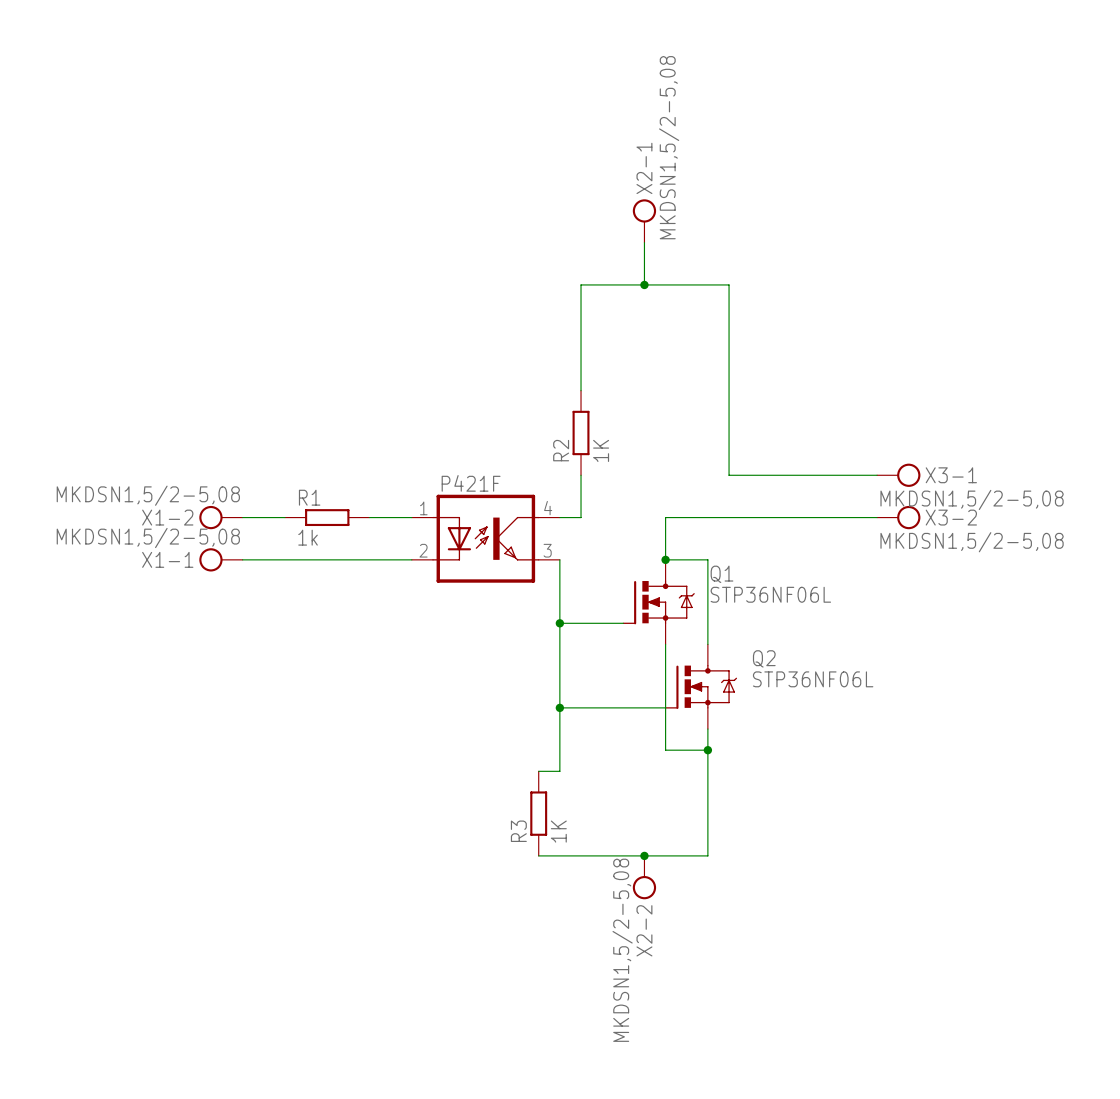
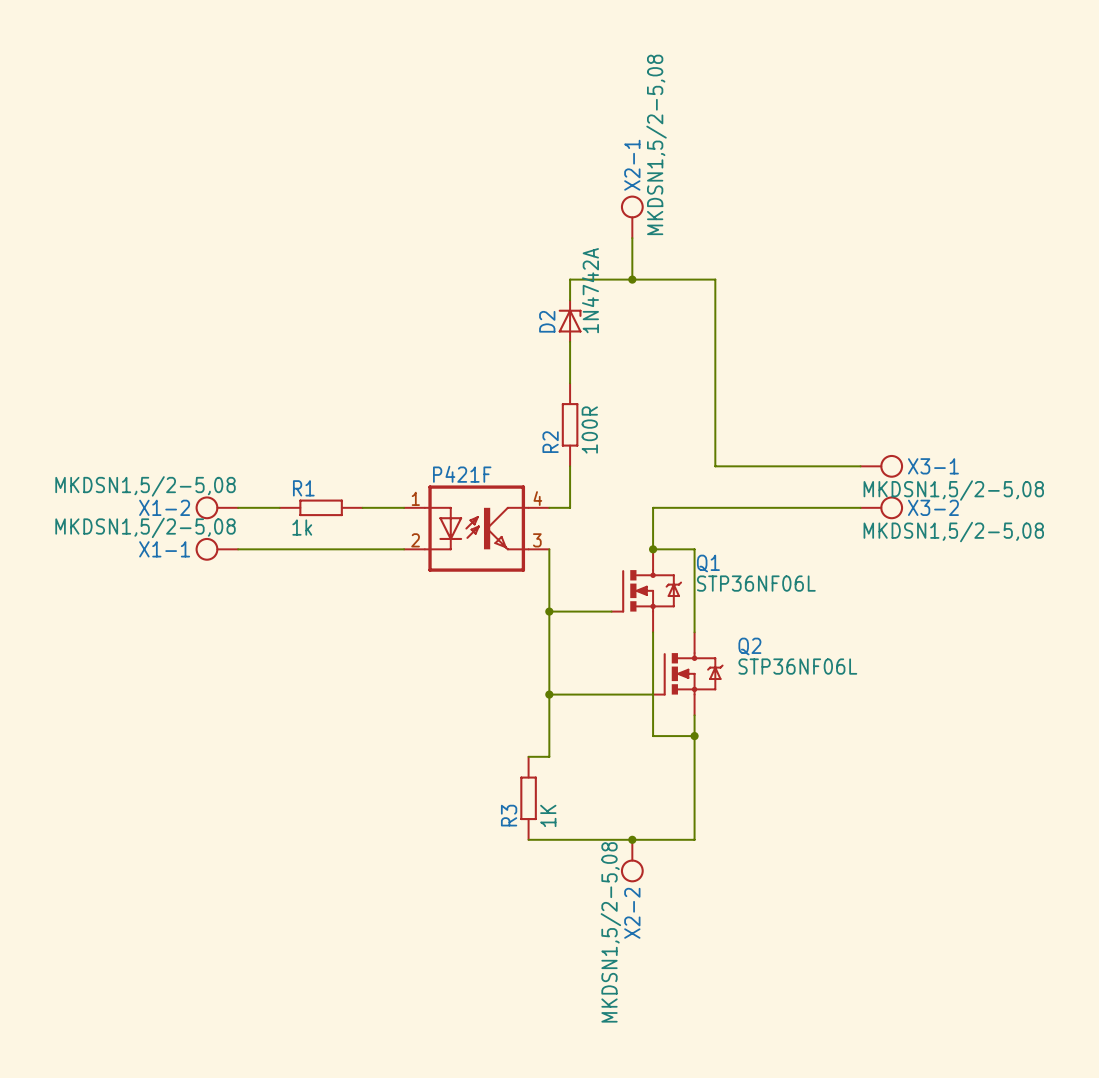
D2: none -> 1N4742A (570, 321)
R2 value: 1K (601, 450) -> 100R (589, 429)

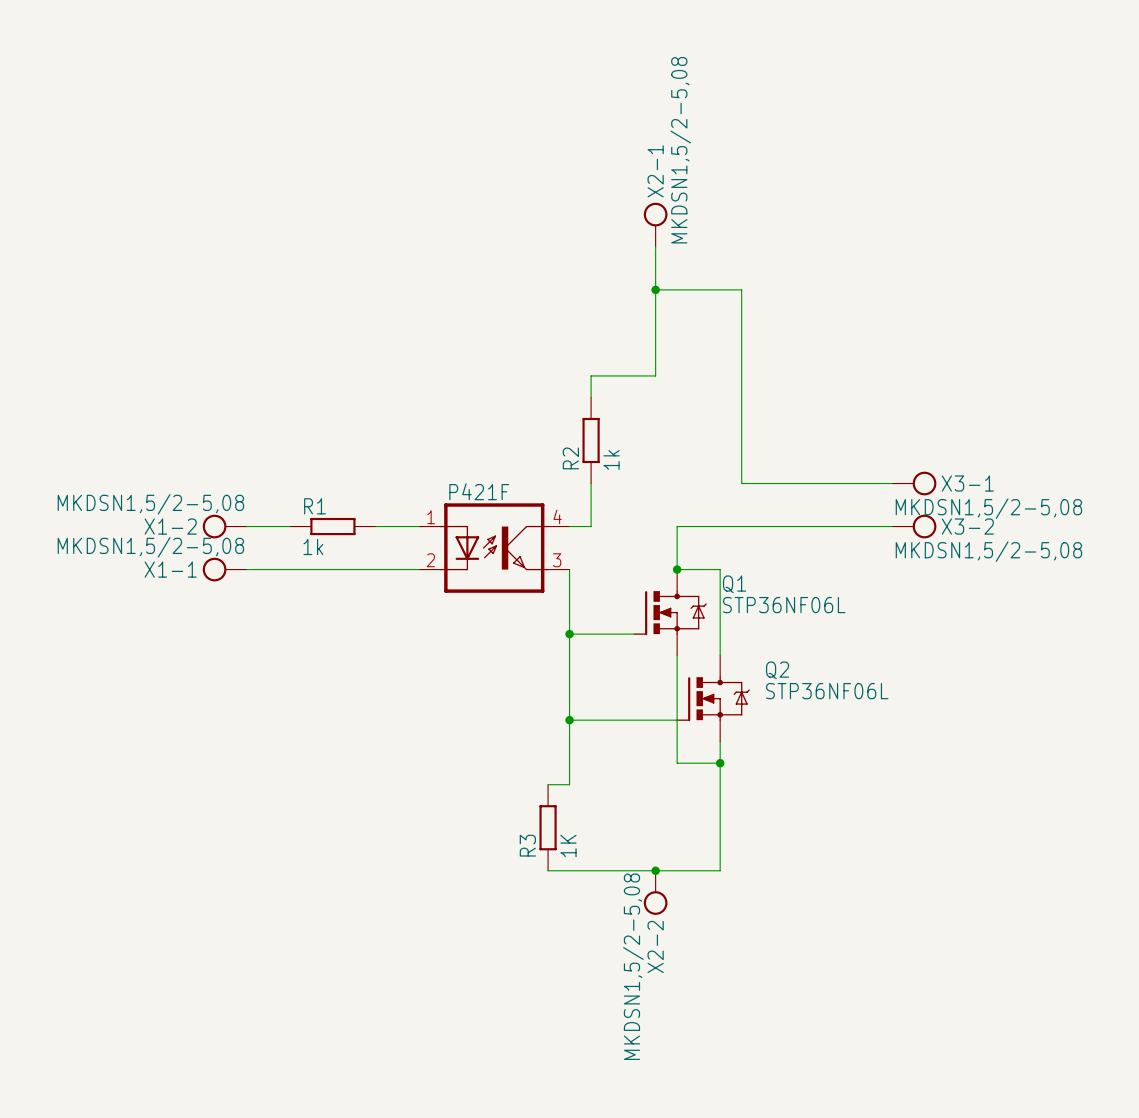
wire: (632, 279) (570, 279) (570, 300) -> (655, 289) (655, 375) (591, 375)
D2: 1N4742A (570, 321) -> none
wire: (570, 341) (570, 362) -> none
R2 value: 100R (589, 429) -> 1k (611, 460)

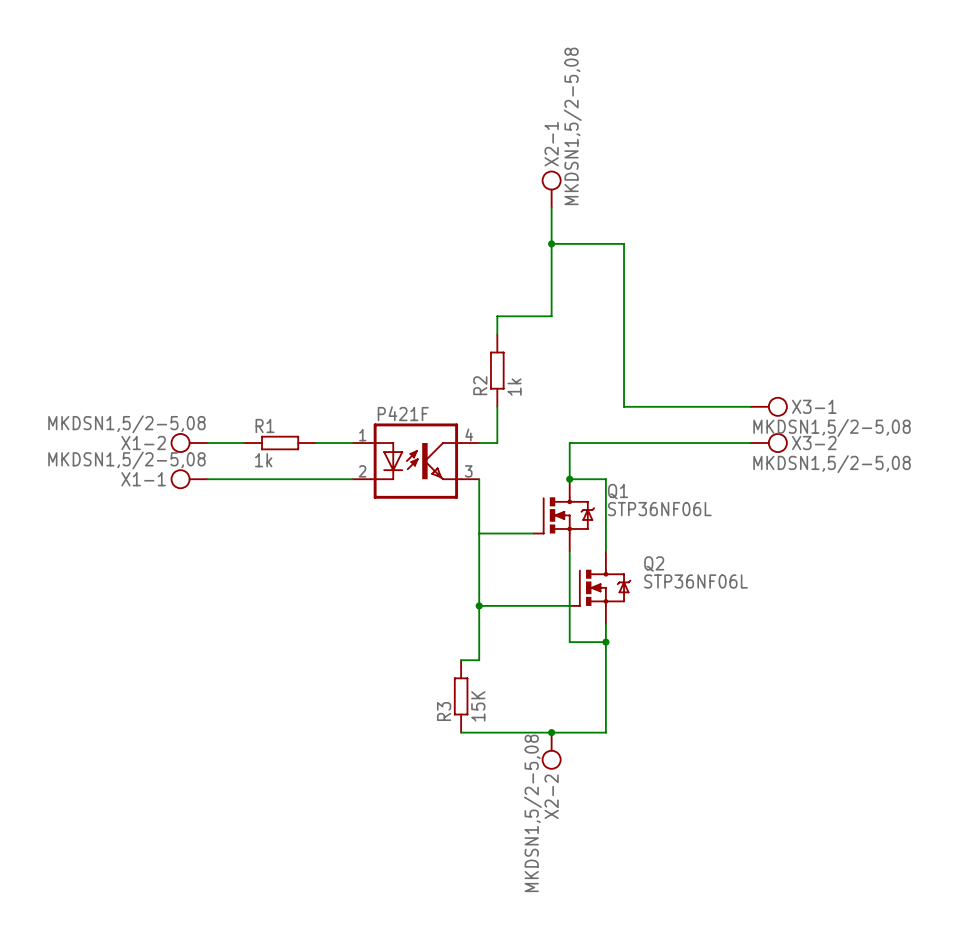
junction: (569, 634) -> none
R3 value: 1K (568, 845) -> 15K (478, 706)

